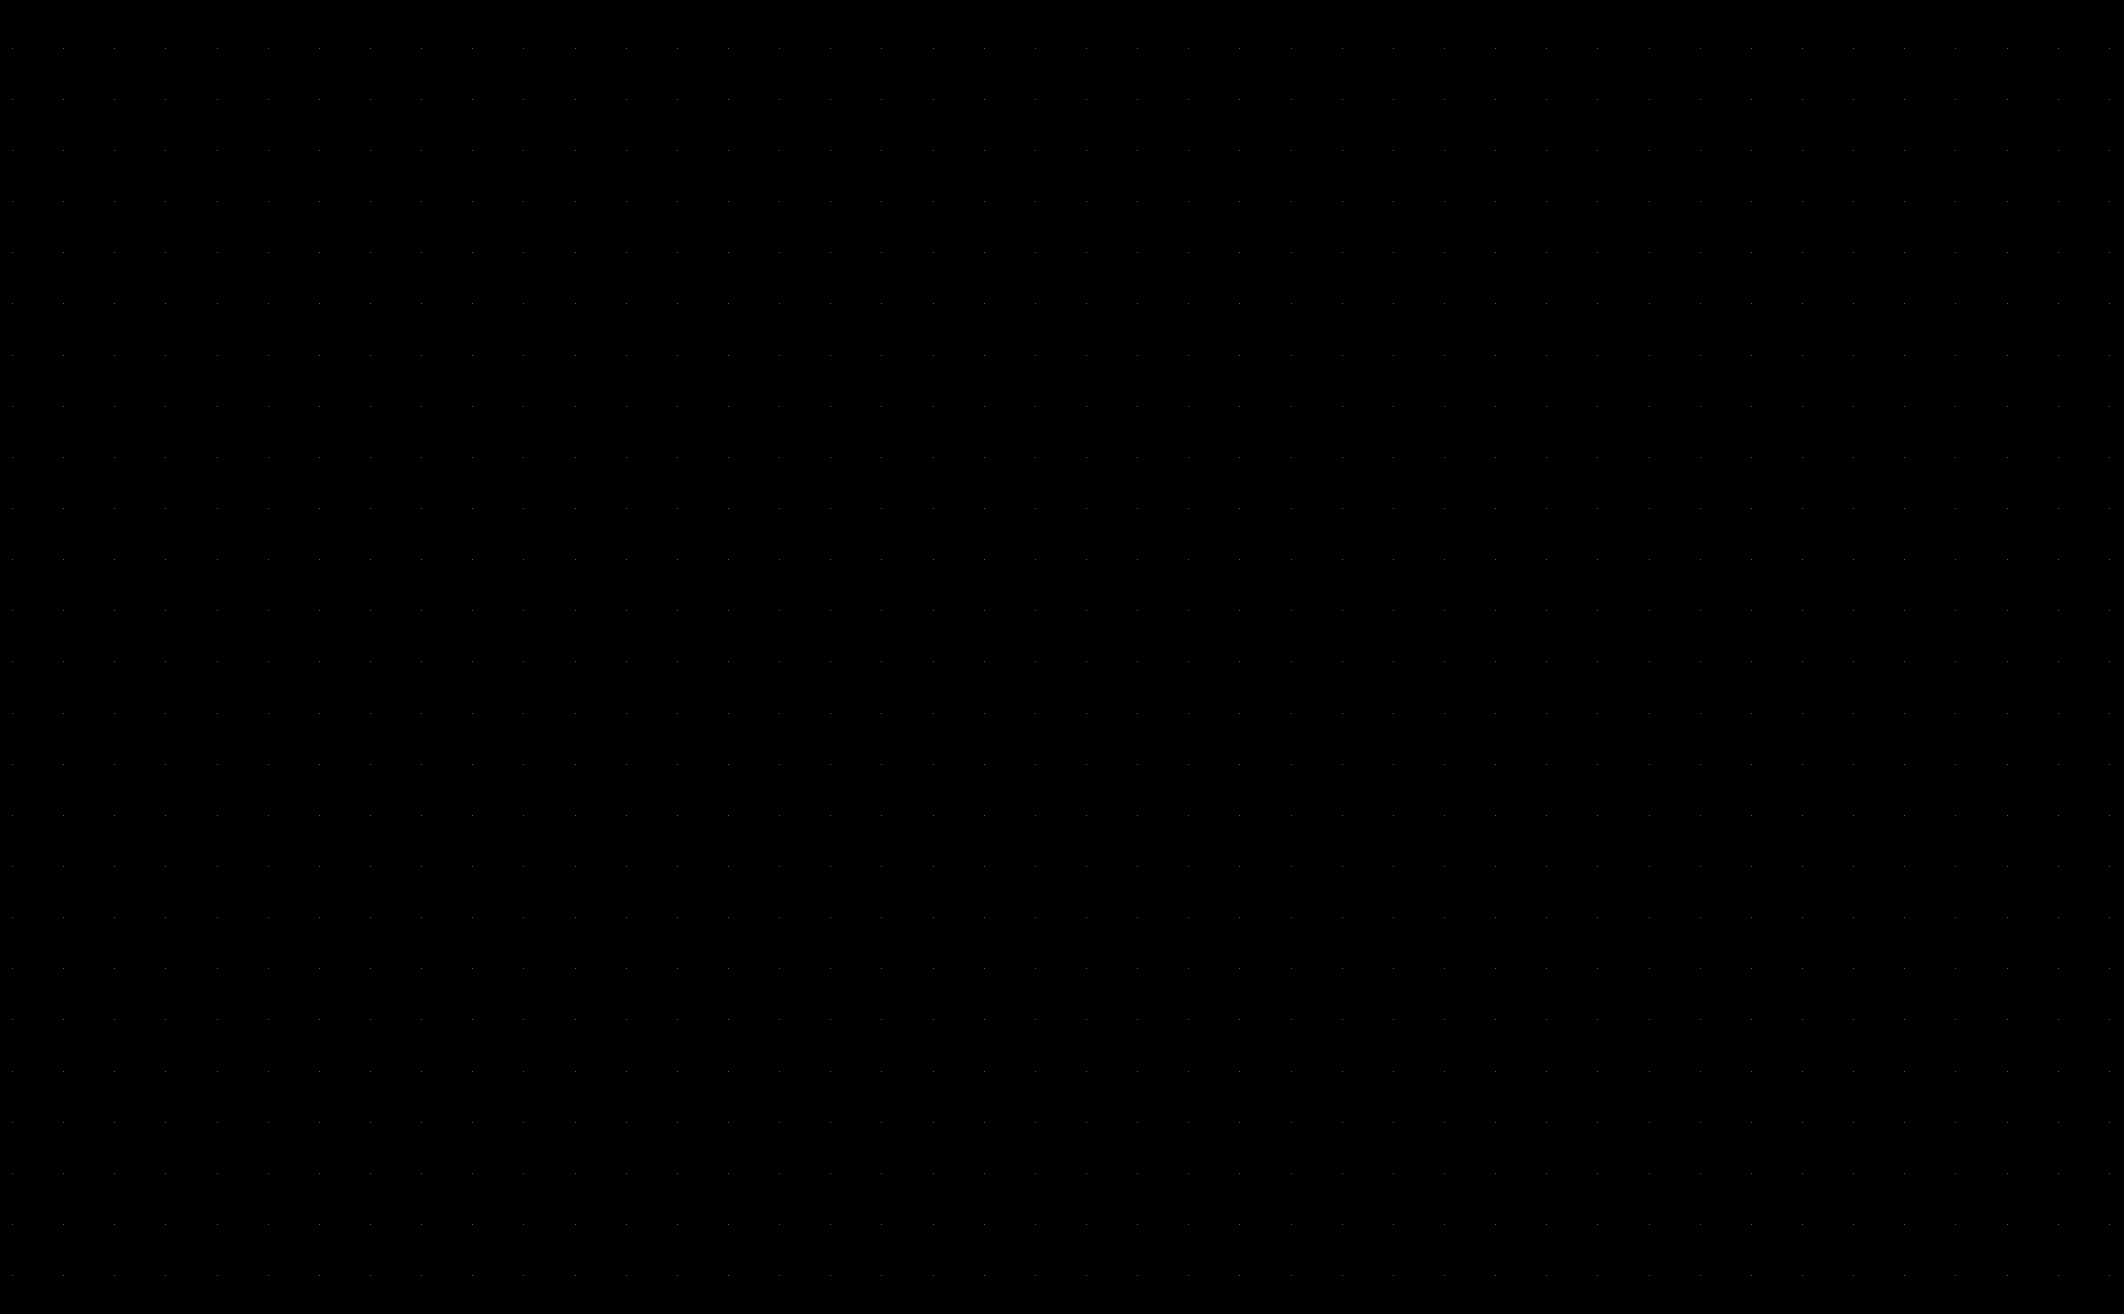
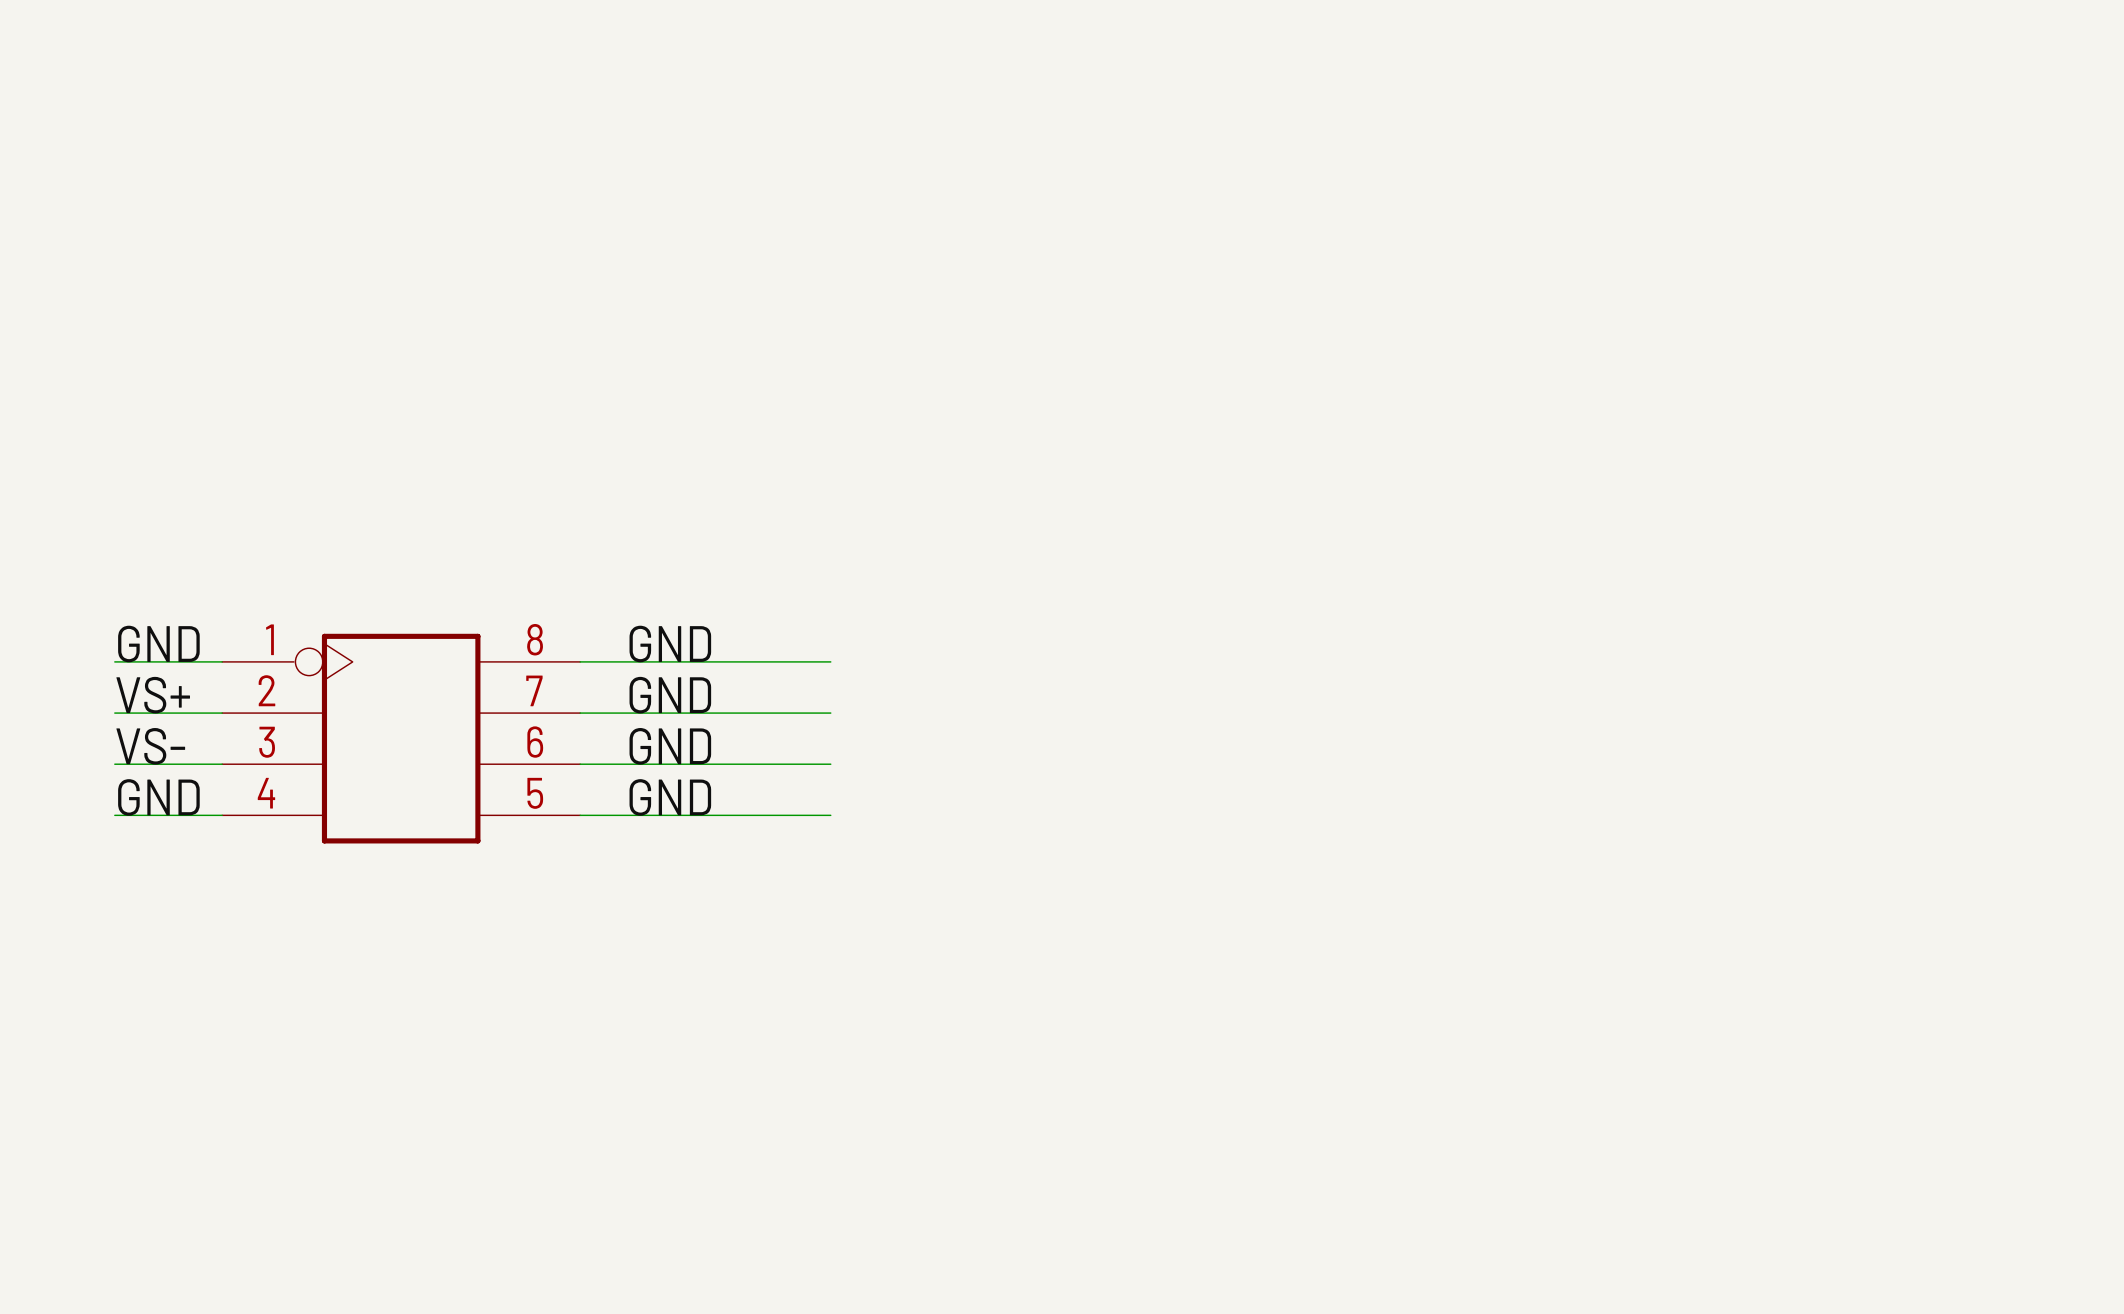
label: none -> GND (158, 644)
label: none -> GND (670, 644)
wire: none -> (114, 661) (222, 661)
wire: none -> (580, 661) (830, 661)
label: none -> VS+ (153, 695)
label: none -> GND (670, 695)
wire: none -> (114, 713) (222, 713)
wire: none -> (580, 713) (830, 713)
part: none -> (401, 738)
label: none -> VS- (150, 746)
label: none -> GND (670, 746)
wire: none -> (114, 764) (222, 764)
wire: none -> (580, 764) (830, 764)
label: none -> GND (158, 797)
label: none -> GND (670, 797)
wire: none -> (114, 815) (222, 815)
wire: none -> (580, 815) (830, 815)

